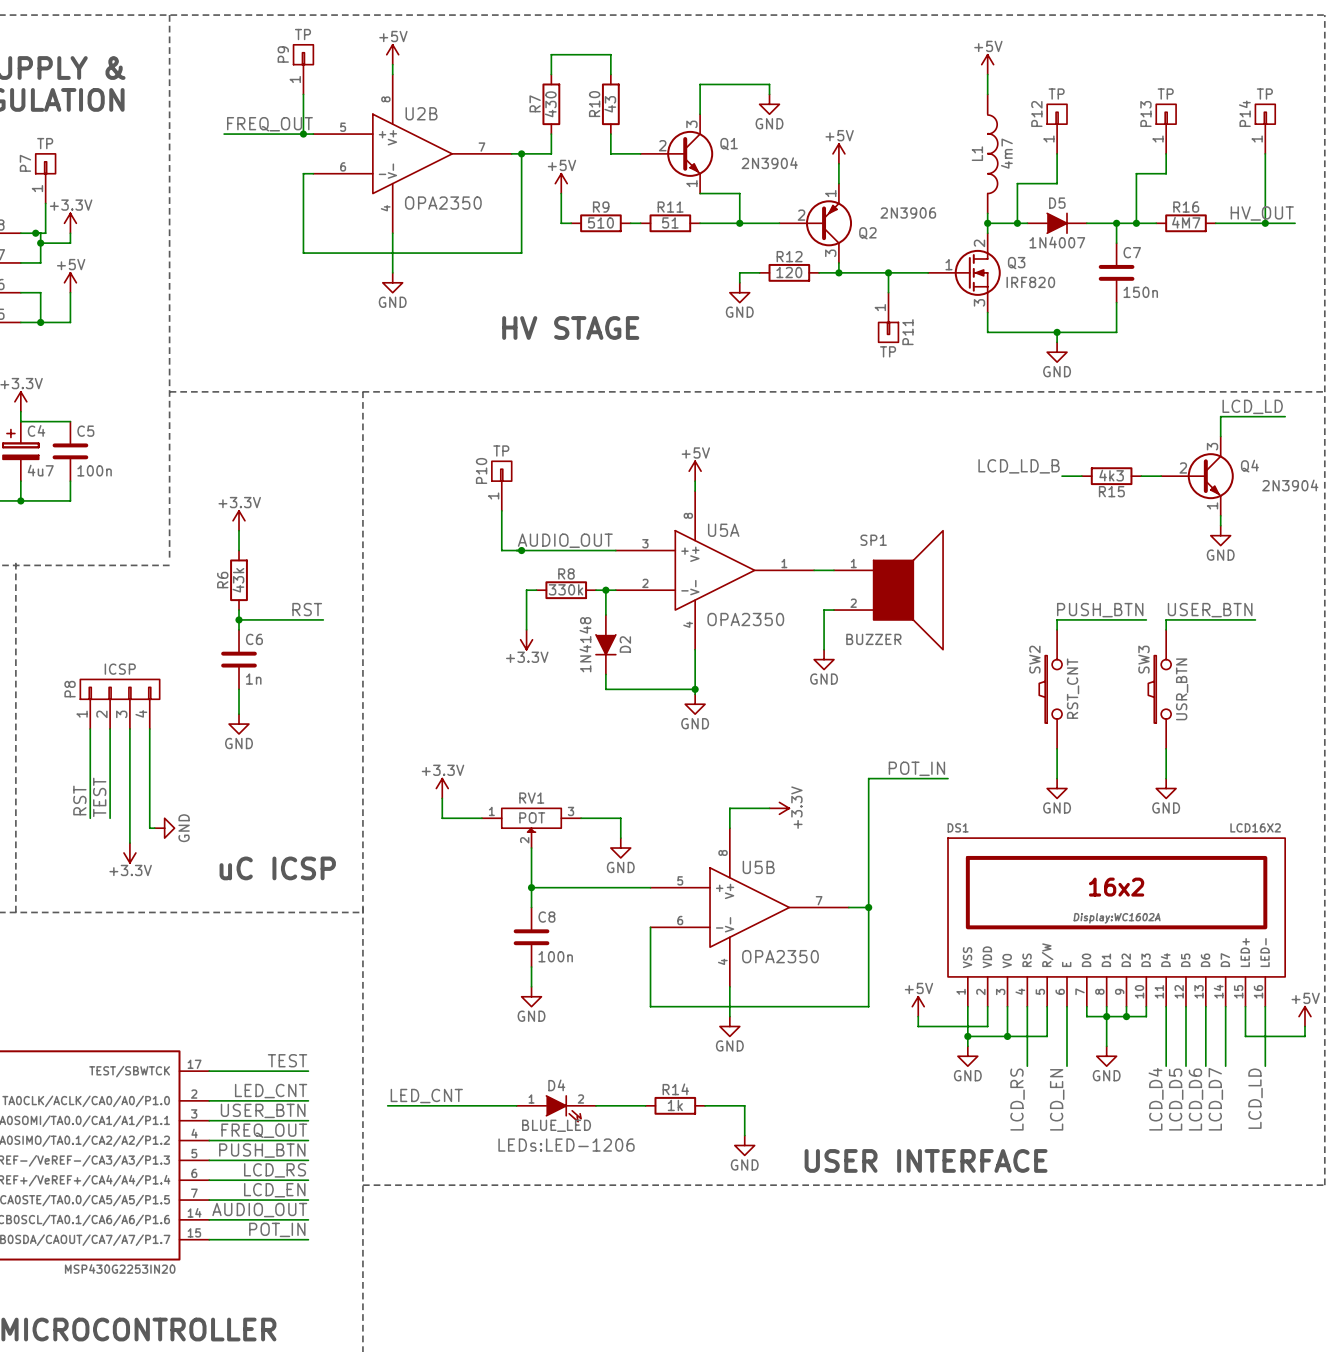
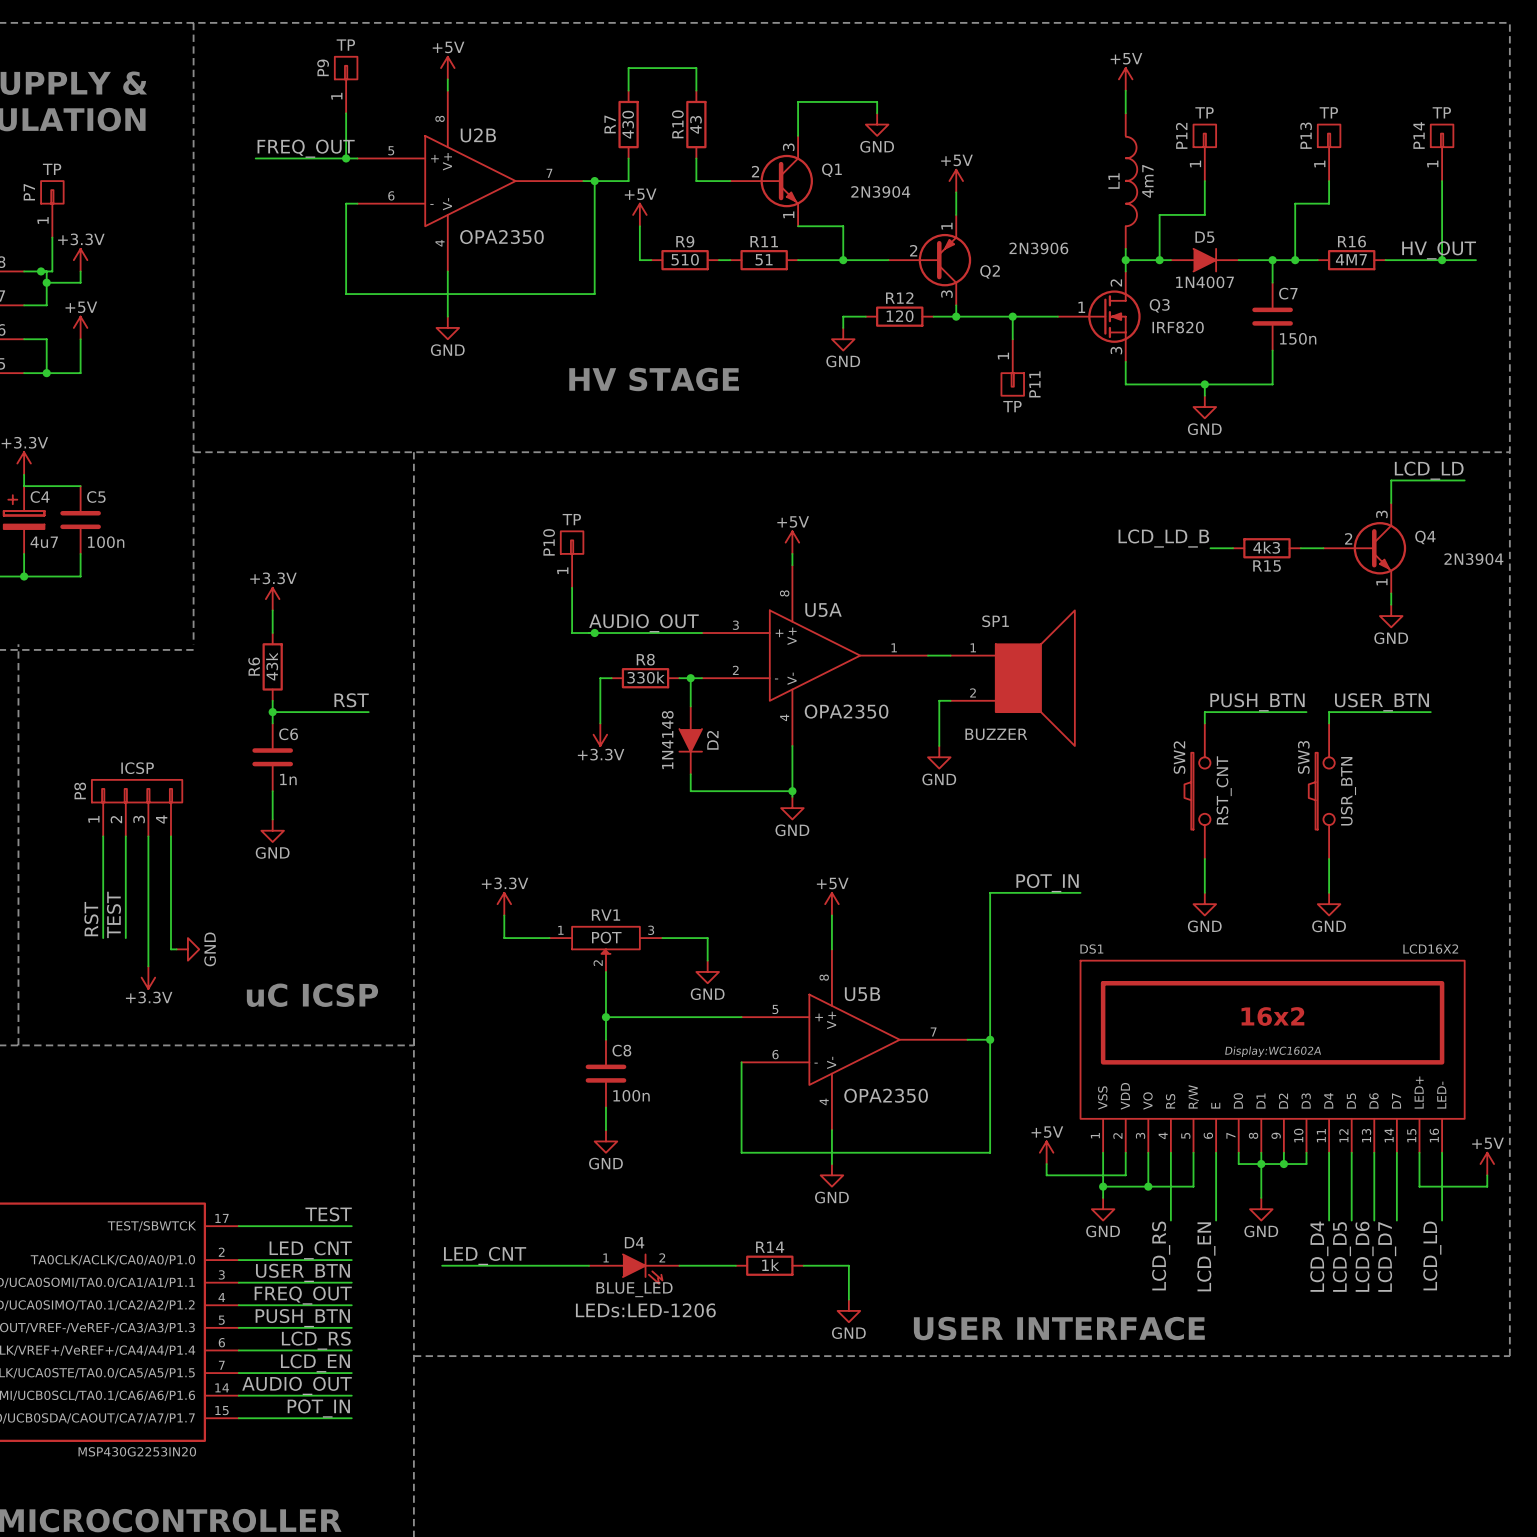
power symbol: none -> +5V (831, 904)
wire: (729, 808) (769, 808) -> (831, 926) (831, 915)
power symbol: +3.3V (779, 808) -> none

